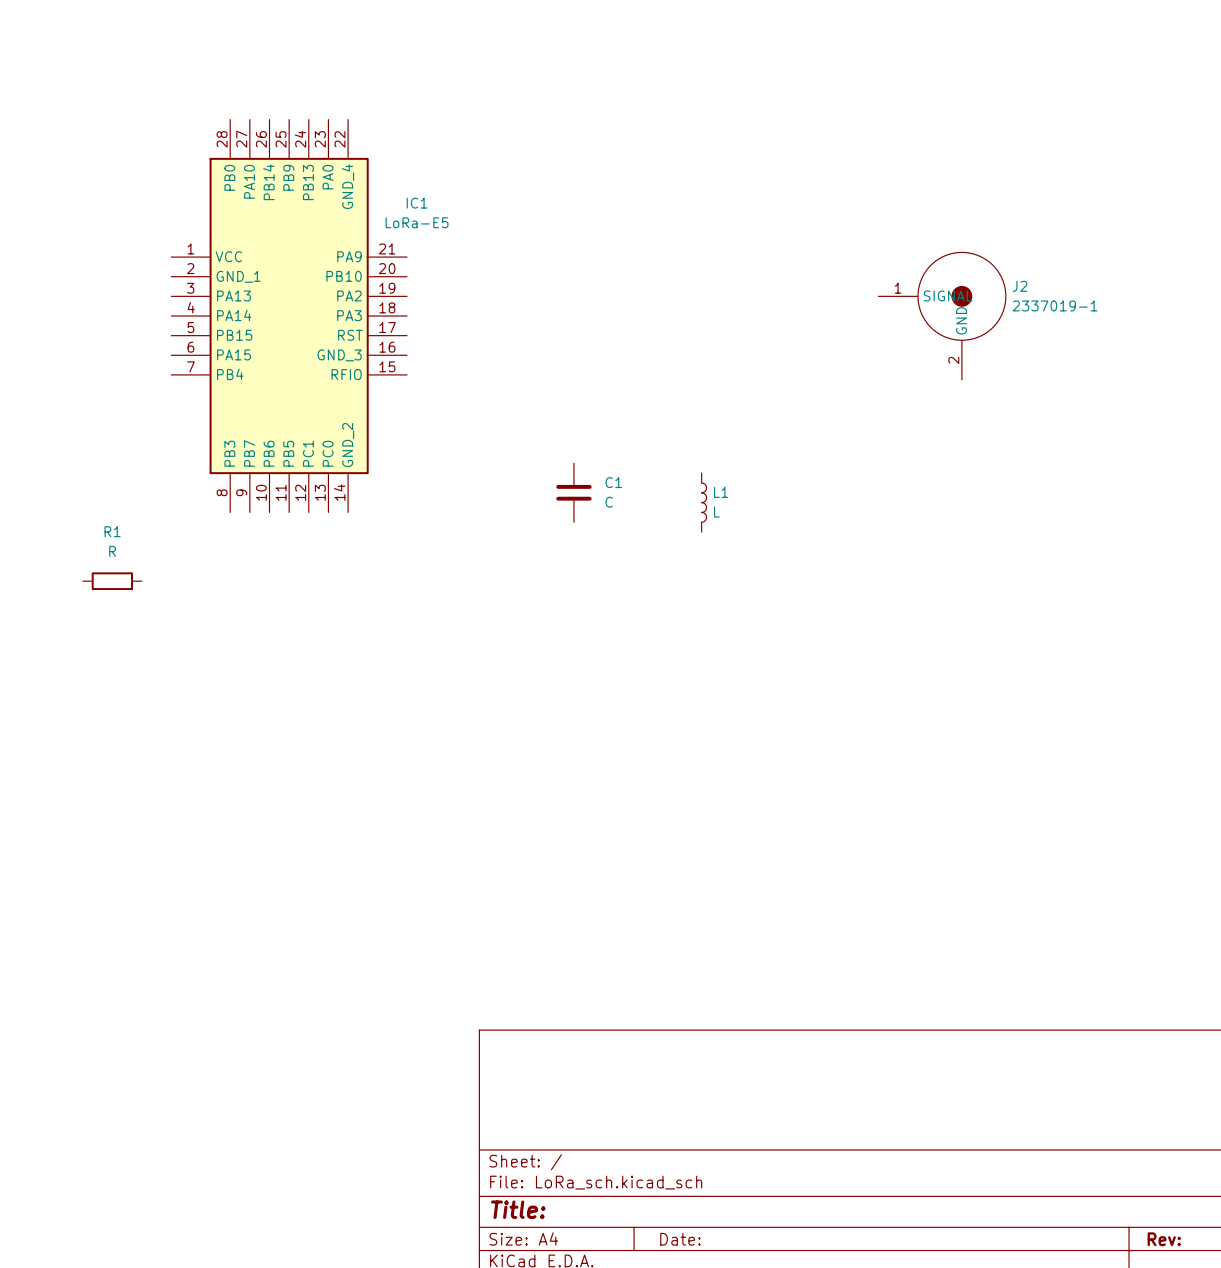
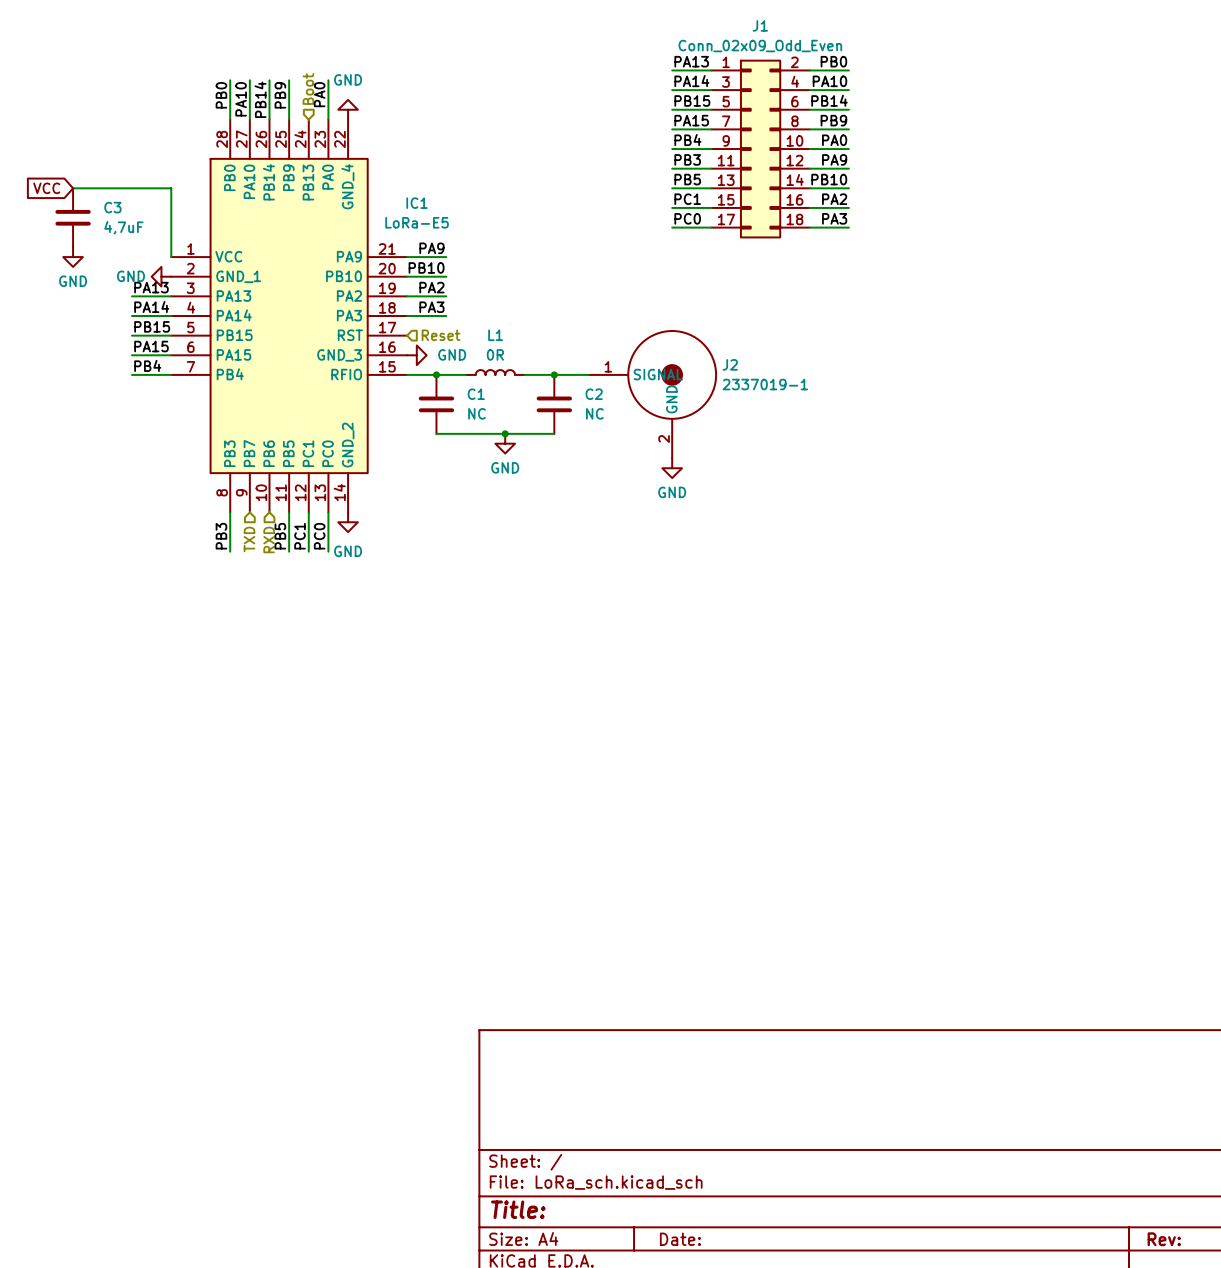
label: none -> PA13 (691, 61)
label: none -> PB0 (833, 61)
wire: none -> (672, 70) (711, 70)
wire: none -> (809, 70) (848, 70)
wire: none -> (230, 80) (230, 119)
wire: none -> (249, 80) (249, 119)
wire: none -> (269, 80) (269, 119)
wire: none -> (289, 80) (289, 119)
wire: none -> (328, 80) (328, 119)
label: none -> PA14 (691, 81)
label: none -> PA10 (829, 81)
hierarchical label: none -> Boot (308, 89)
wire: none -> (672, 90) (711, 90)
wire: none -> (809, 90) (848, 90)
label: none -> PA0 (319, 94)
label: none -> PB0 (221, 95)
label: none -> PB9 (280, 95)
label: none -> PA10 (241, 99)
label: none -> PB14 (260, 99)
label: none -> PB15 (692, 100)
label: none -> PB14 (829, 100)
power symbol: none -> GND (348, 109)
wire: none -> (672, 109) (711, 109)
wire: none -> (809, 109) (848, 109)
label: none -> PA15 (691, 120)
label: none -> PB9 (833, 120)
wire: none -> (672, 129) (711, 129)
wire: none -> (809, 129) (848, 129)
label: none -> PB4 (687, 140)
label: none -> PA0 (834, 140)
wire: none -> (672, 149) (711, 149)
J1: none -> Conn_02x09_Odd_Even (760, 149)
wire: none -> (809, 149) (848, 149)
label: none -> PB3 (687, 159)
label: none -> PA9 (834, 159)
wire: none -> (672, 168) (711, 168)
wire: none -> (809, 168) (848, 168)
label: none -> PB5 (687, 179)
label: none -> PB10 (829, 179)
global label: none -> VCC (46, 188)
wire: none -> (73, 188) (171, 188) (171, 257)
wire: none -> (672, 188) (711, 188)
wire: none -> (809, 188) (848, 188)
label: none -> PC1 (687, 199)
label: none -> PA2 (834, 199)
wire: none -> (672, 207) (711, 207)
wire: none -> (809, 207) (848, 207)
C3: none -> 4,7uF (73, 217)
label: none -> PC0 (687, 218)
label: none -> PA3 (834, 218)
wire: none -> (672, 227) (711, 227)
wire: none -> (809, 227) (848, 227)
label: none -> PA9 (431, 248)
power symbol: none -> GND (73, 257)
wire: none -> (407, 257) (446, 257)
label: none -> PB10 (426, 267)
power symbol: none -> GND (161, 276)
wire: none -> (407, 276) (446, 276)
label: none -> PA13 (151, 287)
label: none -> PA2 (431, 287)
wire: none -> (131, 296) (171, 296)
wire: none -> (407, 296) (446, 296)
label: none -> PA14 (151, 307)
label: none -> PA3 (431, 307)
wire: none -> (131, 316) (171, 316)
wire: none -> (407, 316) (446, 316)
J2 position: (942, 316) -> (652, 394)
label: none -> PB15 (152, 326)
wire: none -> (131, 335) (171, 335)
hierarchical label: none -> Reset (441, 335)
label: none -> PA15 (151, 346)
wire: none -> (131, 355) (171, 355)
power symbol: none -> GND (416, 355)
label: none -> PB4 (147, 365)
wire: none -> (131, 374) (171, 374)
wire: none -> (407, 374) (465, 374)
junction: none -> (436, 374)
wire: none -> (524, 374) (588, 374)
junction: none -> (554, 374)
C2: none -> NC (554, 404)
wire: none -> (436, 433) (554, 433)
junction: none -> (505, 433)
power symbol: none -> GND (505, 443)
power symbol: none -> GND (672, 468)
C1 position: (573, 492) -> (436, 404)
L1 name position: L1 (721, 492) -> L1 (495, 335)
C1 value: C (609, 502) -> NC (476, 413)
L1 rotation: 0° (704, 502) -> 90° counterclockwise (495, 372)
L1 position: (704, 502) -> (495, 372)
wire: none -> (230, 512) (230, 551)
wire: none -> (289, 512) (289, 551)
wire: none -> (308, 512) (308, 551)
wire: none -> (328, 512) (328, 551)
L1 value: L (716, 512) -> 0R (495, 354)
power symbol: none -> GND (348, 522)
label: none -> PB3 (221, 536)
label: none -> PB5 (280, 536)
label: none -> PC1 (300, 536)
label: none -> PC0 (319, 536)
hierarchical label: none -> TXD (249, 539)
hierarchical label: none -> RXD (269, 539)
R1: R (112, 581) -> none

